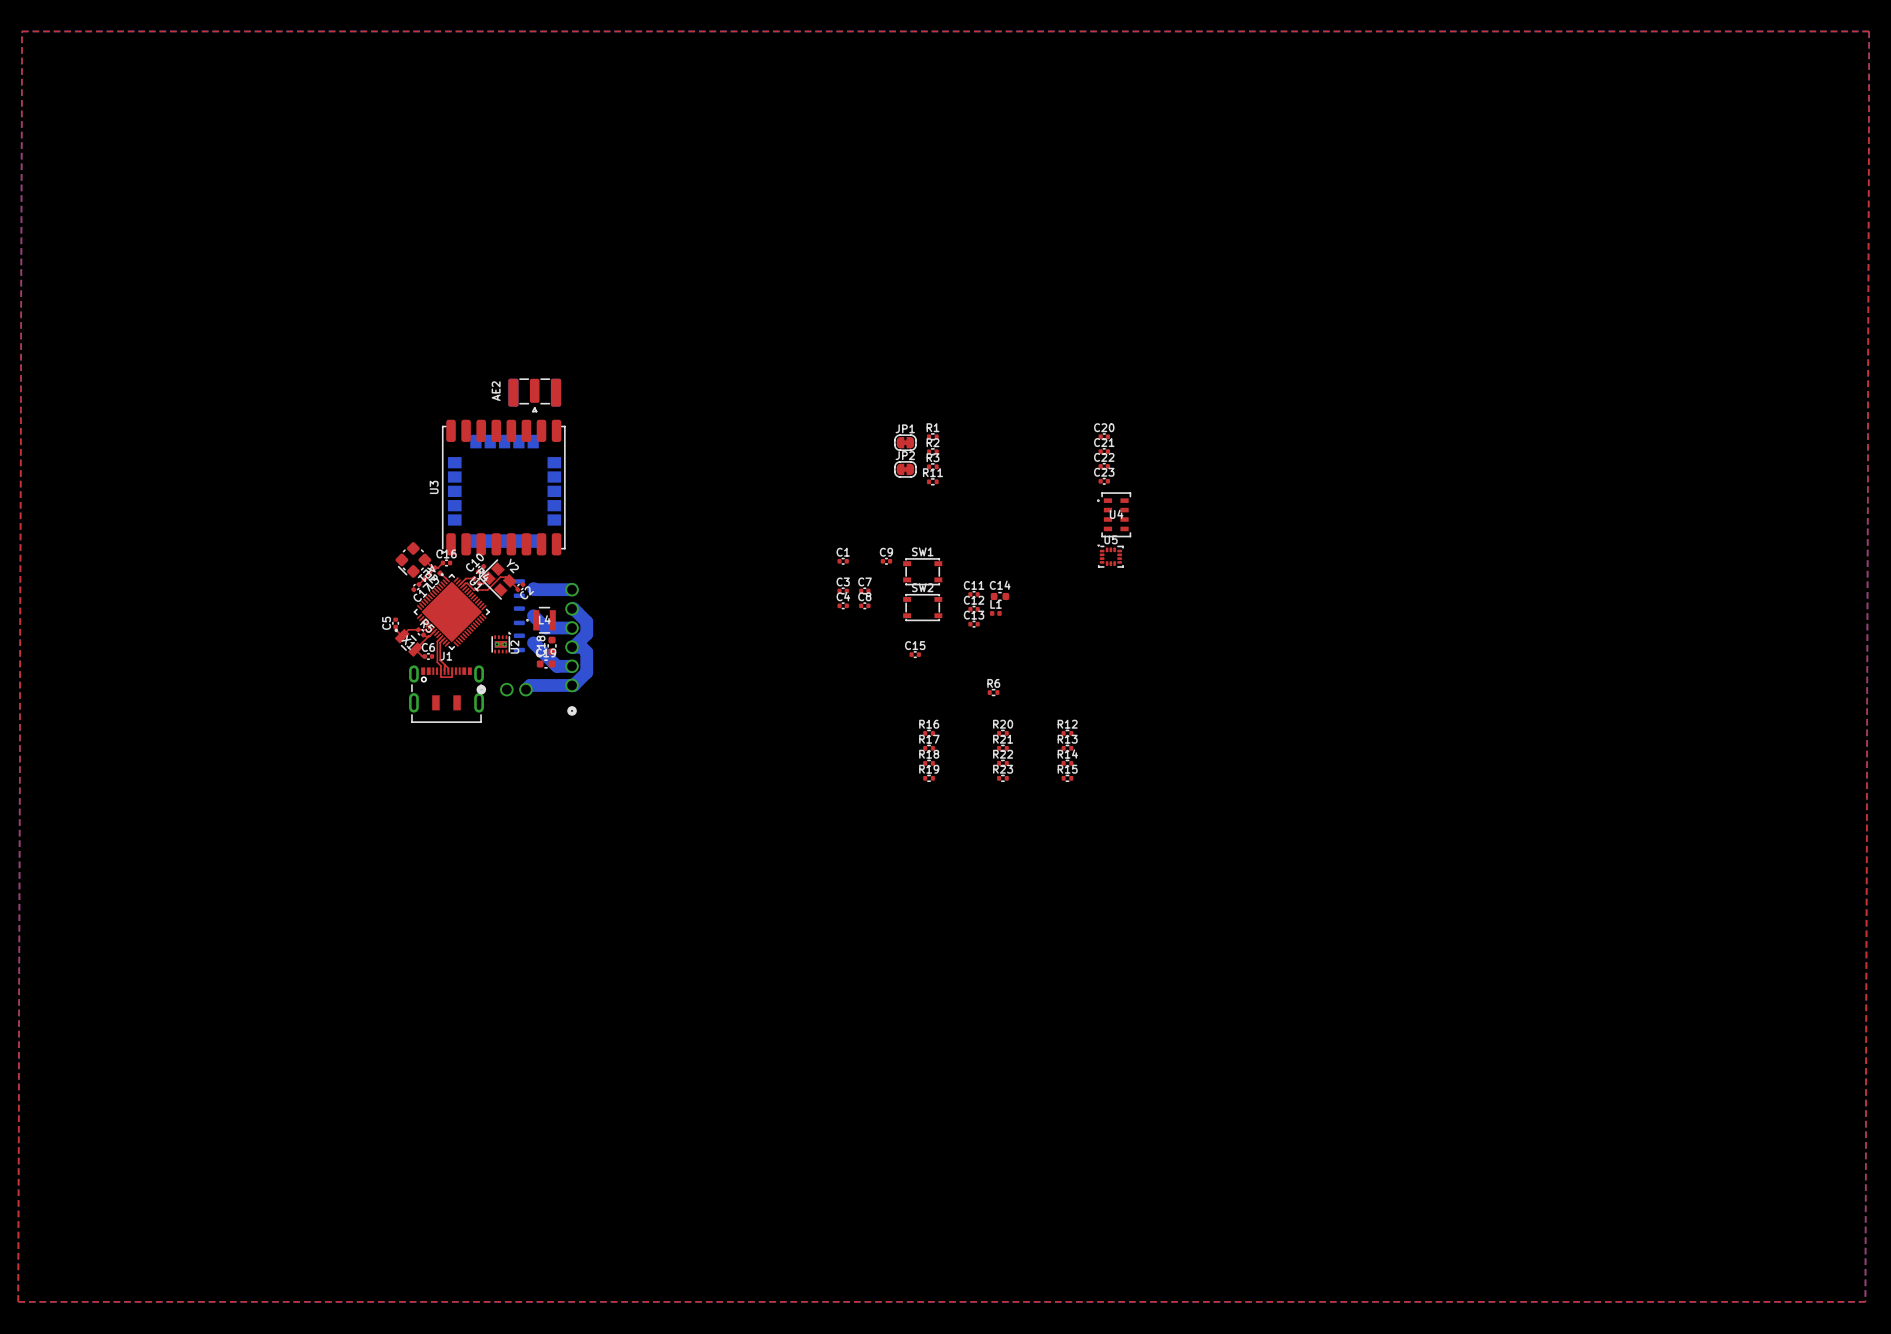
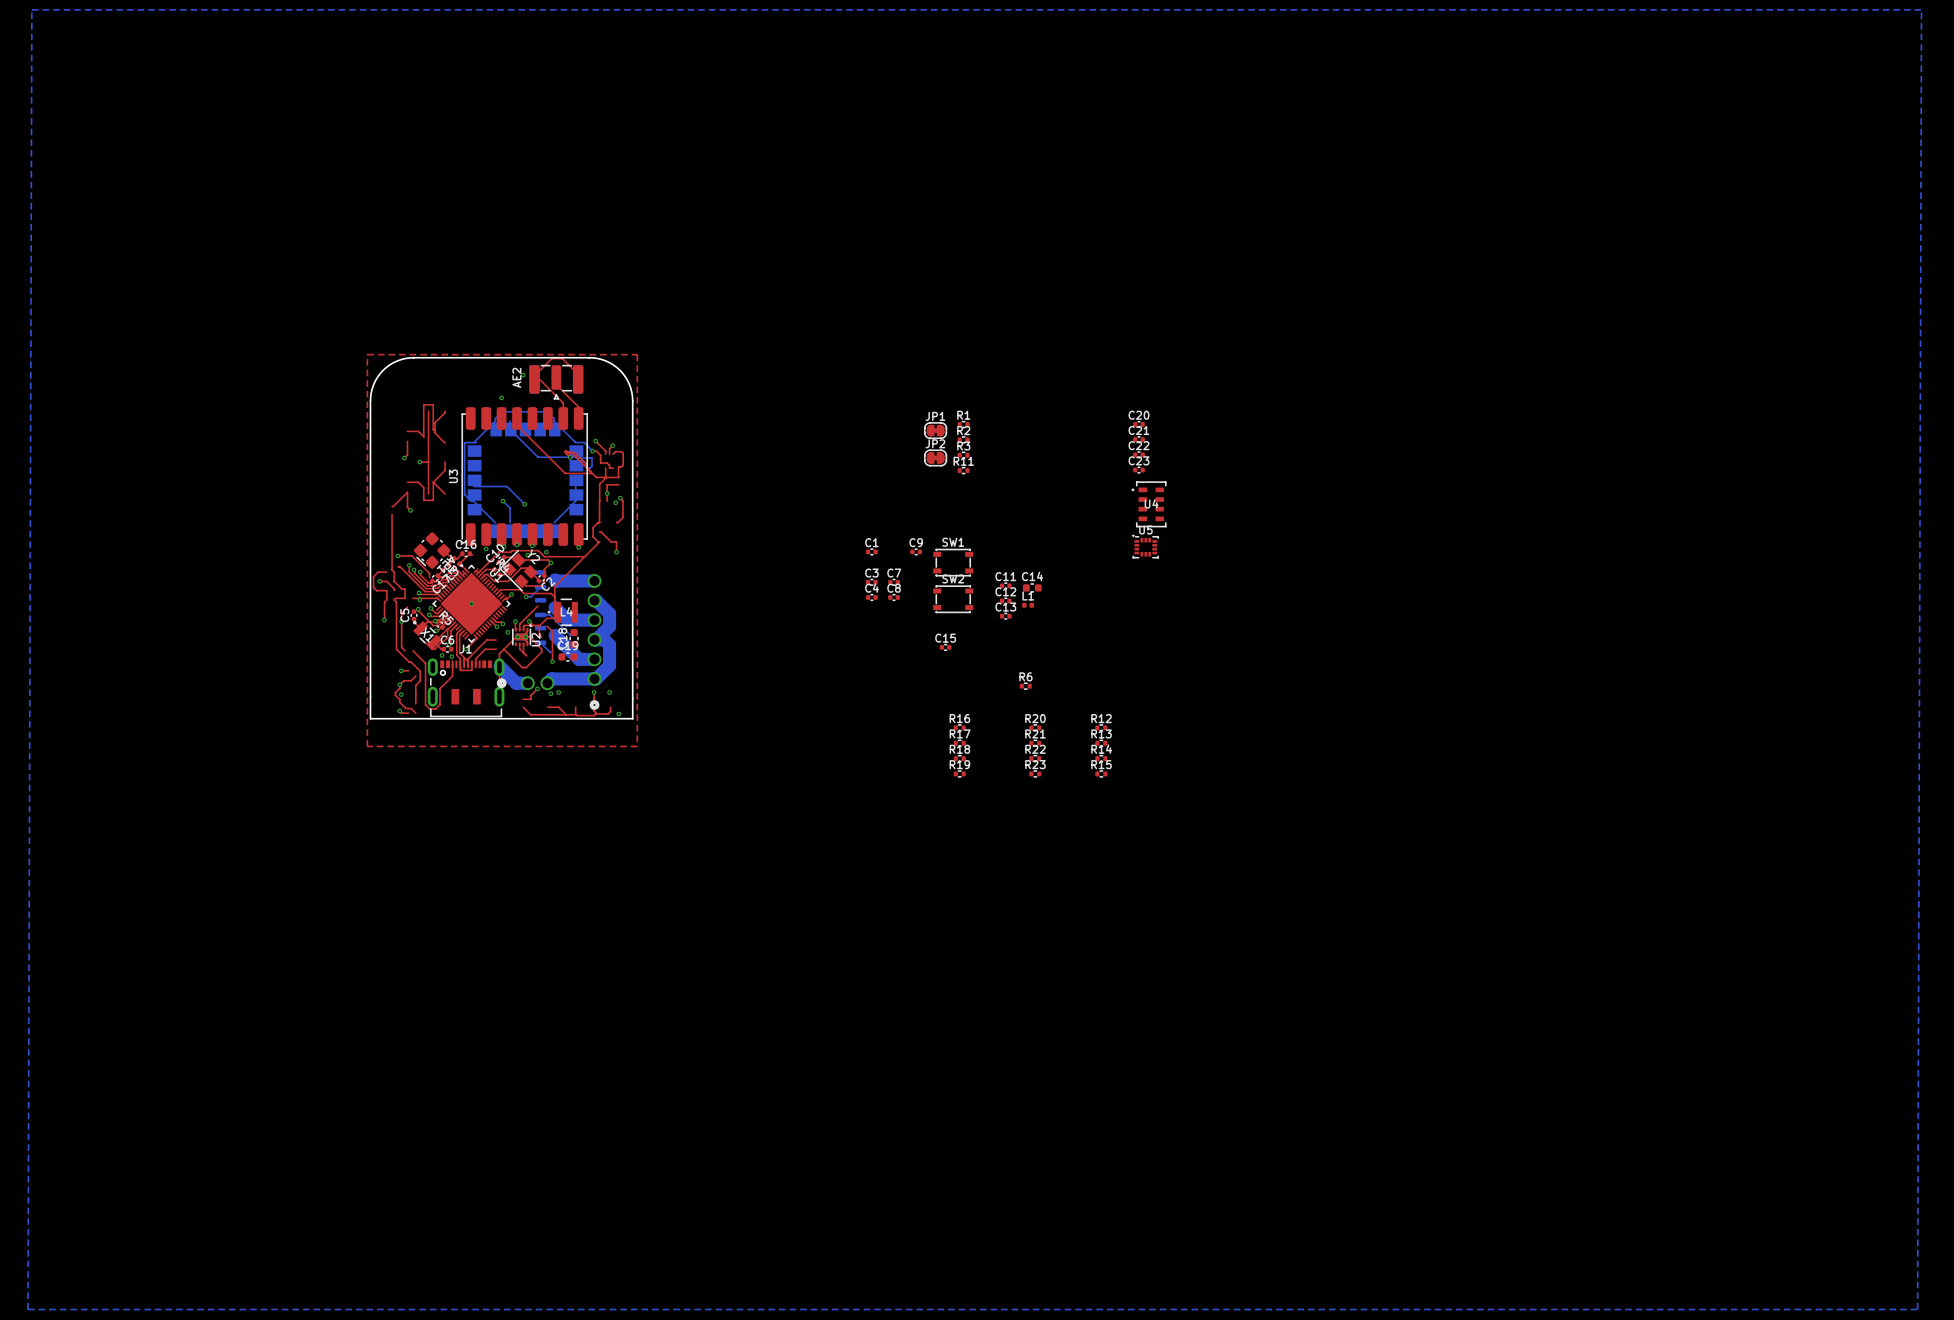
top zone outline: (22, 31) (18, 1301) (1865, 1301) (1869, 31) (22, 31) -> none
top zone outline: none -> (367, 354) (367, 746) (637, 746) (637, 354) (367, 354)
board edge: none -> (413, 357) (593, 357) (609, 362) (625, 376) (630, 388) (632, 400) (632, 718) (370, 718) (370, 396) (375, 380) (386, 367) (401, 359) (413, 357)
top track: none -> (557, 373) (557, 385) (578, 407) (578, 413)
via: none -> (523, 375)
top track: none -> (578, 375) (562, 358) (551, 358) (535, 375) (563, 403) (563, 413)
via: none -> (501, 397)
top track: none -> (428, 411) (428, 494)
top track: none -> (445, 411) (435, 422) (435, 433) (445, 443)
top track: none -> (517, 413) (517, 425) (565, 473) (590, 473)
bottom track: none -> (510, 420) (510, 429) (538, 457) (575, 457) (576, 458) (591, 458) (591, 466) (587, 467) (585, 463) (575, 452) (569, 452)
top track: none -> (407, 431) (418, 431) (423, 436) (423, 404) (433, 404) (433, 429) (435, 431)
top track: none -> (595, 441) (605, 451) (605, 454)
via: none -> (595, 441)
top track: none -> (407, 441) (407, 454) (404, 458)
bottom track: none -> (473, 442) (502, 411) (547, 411) (575, 442) (584, 442) (592, 451)
bottom track: none -> (476, 442) (464, 443) (464, 494) (495, 522)
top track: none -> (612, 445) (609, 448) (609, 454)
via: none -> (612, 445)
top track: none -> (565, 451) (570, 457)
top track: none -> (565, 451) (569, 452)
top track: none -> (592, 451) (596, 451) (600, 455) (600, 463) (607, 463) (609, 468) (613, 468)
via: none -> (592, 451)
top track: none -> (569, 452) (575, 452) (585, 463) (590, 473)
top track: none -> (571, 452) (596, 477) (618, 477) (618, 466) (623, 465) (623, 453) (615, 451) (613, 454)
via: none -> (570, 457)
via: none -> (404, 458)
top track: none -> (418, 462) (428, 462)
via: none -> (419, 462)
top track: none -> (445, 462) (445, 470) (433, 482)
top track: none -> (605, 468) (606, 477) (599, 484) (599, 522) (597, 522)
top track: none -> (407, 482) (418, 482) (423, 487) (423, 500) (433, 500)
top track: none -> (433, 482) (445, 494)
top track: none -> (433, 482) (433, 500)
top track: none -> (618, 484) (606, 484) (607, 501)
bottom track: none -> (473, 486) (506, 486) (524, 504)
bottom track: none -> (575, 486) (575, 501) (554, 522)
via: none -> (607, 493)
top track: none -> (620, 498) (622, 500) (622, 517) (616, 522)
via: none -> (620, 498)
bottom track: none -> (503, 501) (510, 508) (510, 522)
via: none -> (503, 501)
via: none -> (615, 502)
via: none -> (524, 504)
top track: none -> (392, 506) (407, 492) (407, 507) (410, 510)
via: none -> (410, 510)
top track: none -> (392, 514) (392, 569) (394, 572) (394, 581) (401, 589) (405, 589) (405, 598) (394, 599) (396, 602) (396, 649) (420, 671) (420, 680) (415, 685) (415, 703)
top track: none -> (598, 522) (593, 527) (593, 536) (599, 541) (554, 586) (554, 617) (547, 618) (539, 626)
top track: none -> (599, 532) (611, 541) (616, 541) (616, 552)
via: none -> (517, 545)
via: none -> (532, 545)
via: none -> (504, 546)
via: none -> (578, 547)
via: none -> (486, 549)
via: none -> (546, 552)
via: none -> (616, 552)
top track: none -> (472, 554) (468, 554) (459, 564)
via: none -> (527, 555)
top track: none -> (397, 555) (412, 555) (429, 573) (429, 577)
via: none -> (397, 555)
top track: none -> (584, 556) (544, 556) (538, 550) (499, 552) (478, 573) (476, 570)
top track: none -> (504, 557) (515, 557) (518, 559) (548, 559) (550, 562) (544, 569) (544, 582) (540, 585) (526, 585) (521, 581)
via: none -> (550, 562)
top track: none -> (409, 565) (409, 571) (425, 588) (437, 588) (451, 578) (456, 581)
via: none -> (409, 565)
top track: none -> (398, 566) (424, 591) (438, 591) (444, 585) (449, 588)
top track: none -> (452, 567) (454, 567) (462, 575) (464, 573)
top track: none -> (414, 569) (414, 573) (427, 585) (435, 585) (450, 575) (454, 575) (458, 579)
via: none -> (414, 569)
top track: none -> (420, 572) (420, 574) (428, 582) (436, 581) (448, 573) (456, 573) (460, 577)
via: none -> (420, 572)
top track: none -> (386, 572) (378, 572) (373, 576) (373, 587) (376, 590) (386, 590) (384, 619)
top track: none -> (379, 581) (386, 581) (394, 590)
via: none -> (379, 581)
bottom track: none -> (540, 587) (530, 596) (526, 596)
top track: none -> (419, 592) (418, 594) (437, 594) (440, 597)
via: none -> (419, 592)
top track: none -> (497, 592) (500, 589) (520, 589) (524, 593) (551, 593) (554, 597)
top track: none -> (511, 594) (504, 599)
via: none -> (511, 594)
via: none -> (526, 596)
top track: none -> (412, 598) (438, 599)
via: none -> (419, 599)
via: none -> (471, 603)
top track: none -> (537, 606) (519, 624) (519, 629)
top track: none -> (407, 607) (401, 615) (401, 647) (405, 650)
top track: none -> (430, 608) (435, 613) (440, 610)
via: none -> (430, 608)
top track: none -> (418, 609) (433, 625) (438, 625) (447, 617)
via: none -> (418, 609)
top track: none -> (442, 612) (439, 616) (429, 614)
via: none -> (429, 614)
top track: none -> (445, 614) (440, 619) (435, 621)
bottom track: none -> (540, 614) (550, 614) (570, 635) (574, 635)
via: none -> (384, 619)
top track: none -> (449, 619) (436, 630)
top track: none -> (493, 619) (502, 623)
via: none -> (435, 621)
via: none -> (401, 621)
top track: none -> (491, 621) (496, 626)
top track: none -> (515, 621) (515, 629)
via: none -> (515, 621)
top track: none -> (529, 621) (532, 625)
via: none -> (529, 621)
via: none -> (502, 623)
top track: none -> (456, 625) (450, 630) (450, 642) (449, 644)
top track: none -> (539, 626) (539, 634) (541, 637)
top track: none -> (539, 626) (524, 625) (523, 629)
top track: none -> (547, 626) (552, 631) (552, 661)
top track: (423, 634) (429, 636) -> (425, 642) (434, 649) (447, 637) (448, 628)
via: none -> (496, 626)
top track: none -> (527, 629) (522, 636) (527, 644)
via: none -> (436, 630)
via: none -> (507, 632)
top track: none -> (476, 636) (476, 639) (466, 649)
top track: none -> (496, 640) (486, 640) (468, 658) (468, 661)
bottom track: none -> (540, 642) (550, 652)
via: none -> (449, 644)
top track: none -> (519, 644) (519, 649) (526, 655)
top track: none -> (523, 644) (523, 652)
via: none -> (466, 649)
top track: none -> (496, 649) (485, 649) (475, 658) (475, 664)
top track: none -> (503, 649) (522, 667) (526, 667) (541, 652) (541, 649) (529, 636) (516, 636) (499, 653) (499, 696)
top track: none -> (412, 650) (425, 663) (425, 704) (429, 708) (435, 708) (440, 704) (440, 688) (452, 676) (452, 664)
via: none -> (442, 655)
via: none -> (451, 656)
via: none -> (552, 661)
bottom track: none -> (499, 666) (516, 683) (527, 683)
top track: none -> (401, 670) (408, 670)
via: none -> (401, 670)
top track: none -> (415, 676) (411, 680) (403, 680) (395, 692) (399, 702) (405, 708) (411, 708) (415, 713)
via: none -> (399, 684)
top track: none -> (537, 688) (530, 695) (530, 699) (523, 699)
via: none -> (537, 688)
via: none -> (558, 692)
top track: none -> (594, 692) (593, 699)
via: none -> (594, 692)
via: none -> (609, 692)
via: none -> (550, 693)
via: none -> (401, 694)
top track: none -> (523, 707) (530, 714) (576, 714)
top track: none -> (547, 707) (558, 707) (566, 714)
top track: none -> (575, 707) (577, 715) (595, 714)
top track: none -> (593, 707) (595, 714)
top track: none -> (610, 707) (610, 711) (608, 714) (595, 714)
top track: none -> (399, 710) (401, 713) (408, 713)
via: none -> (399, 710)
via: none -> (618, 714)

